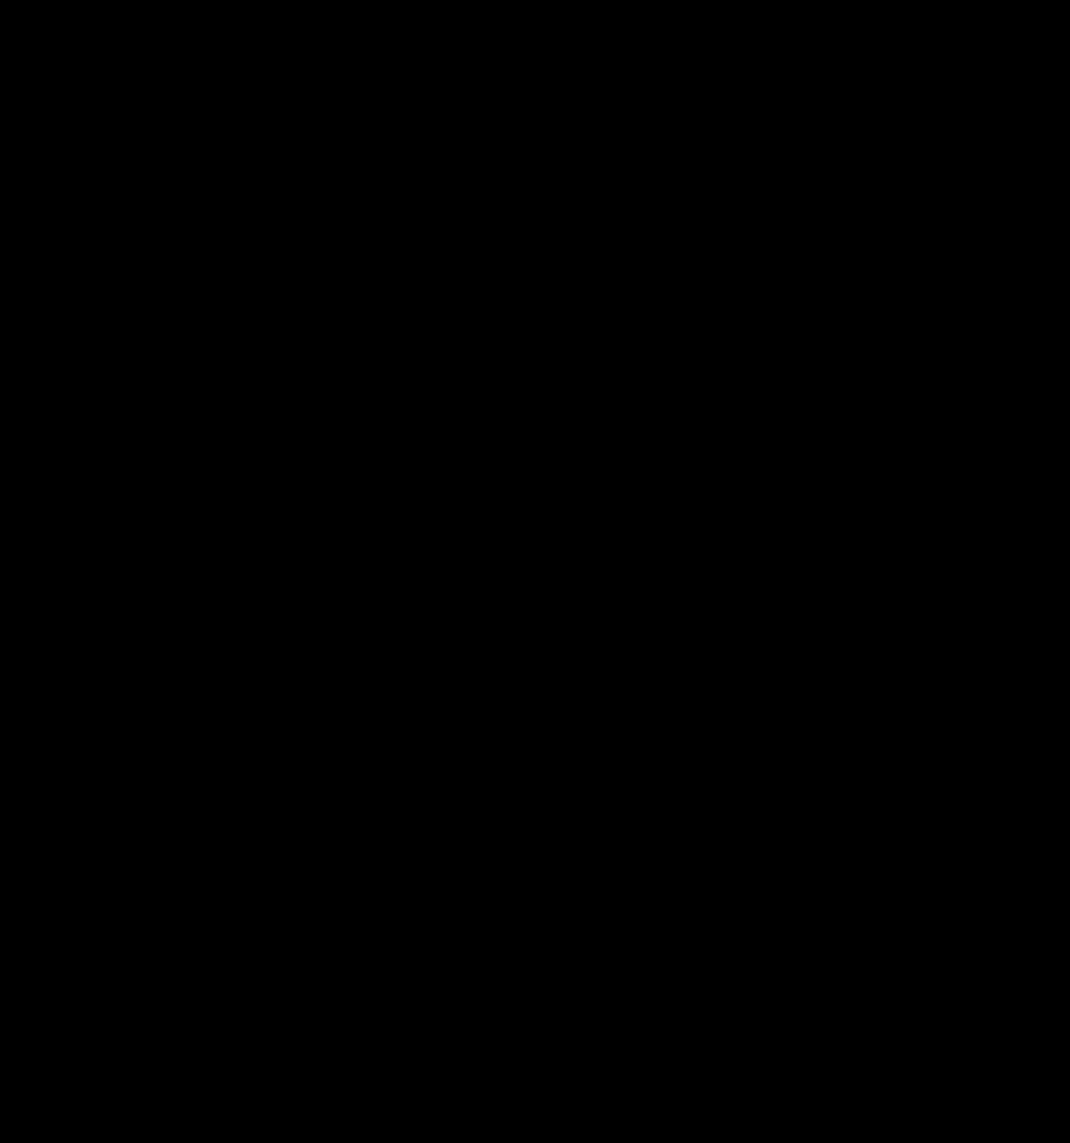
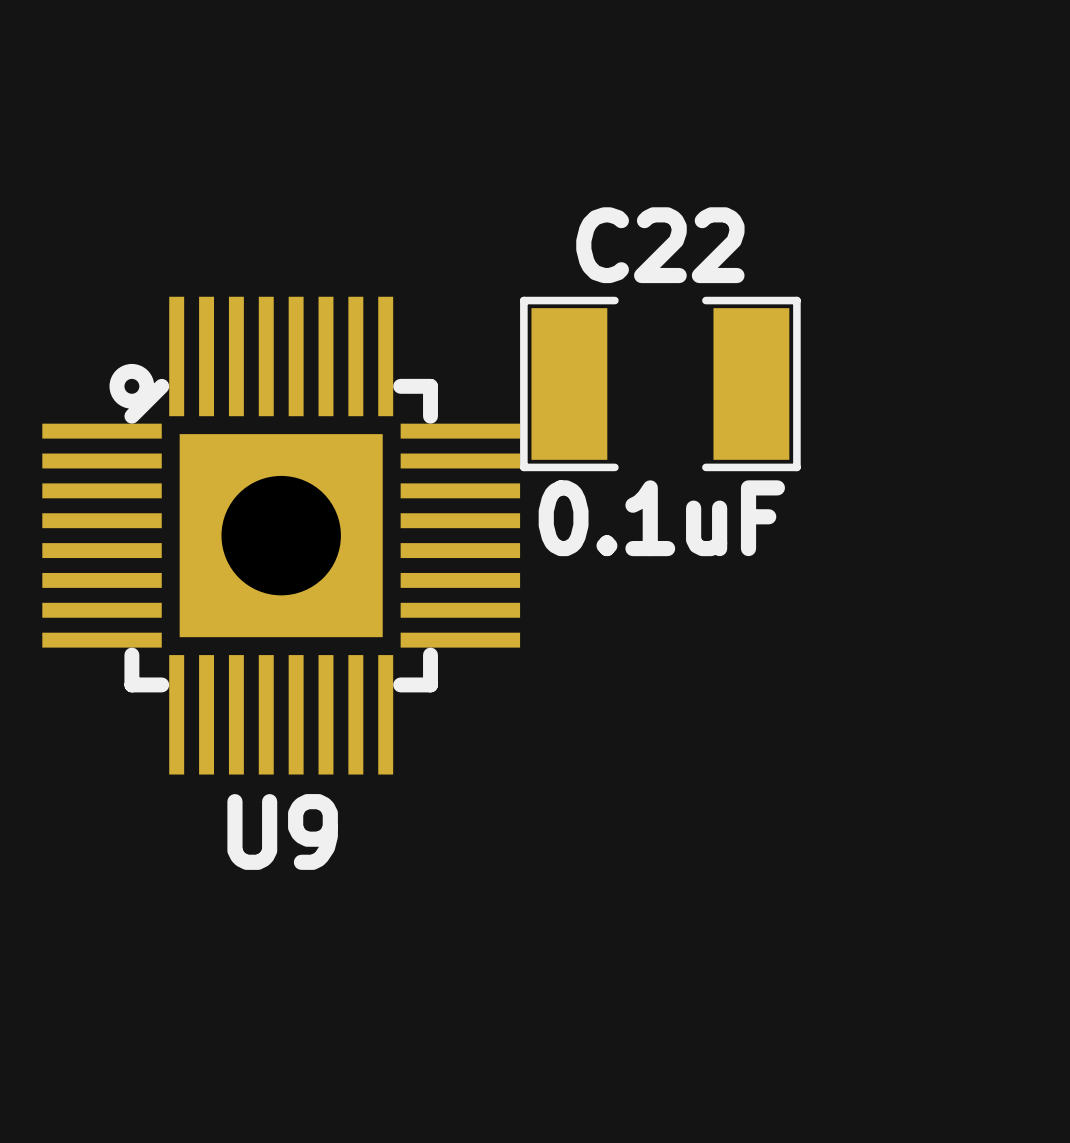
C22: none -> 0.1uF (660, 383)
U9: none -> (281, 535)

